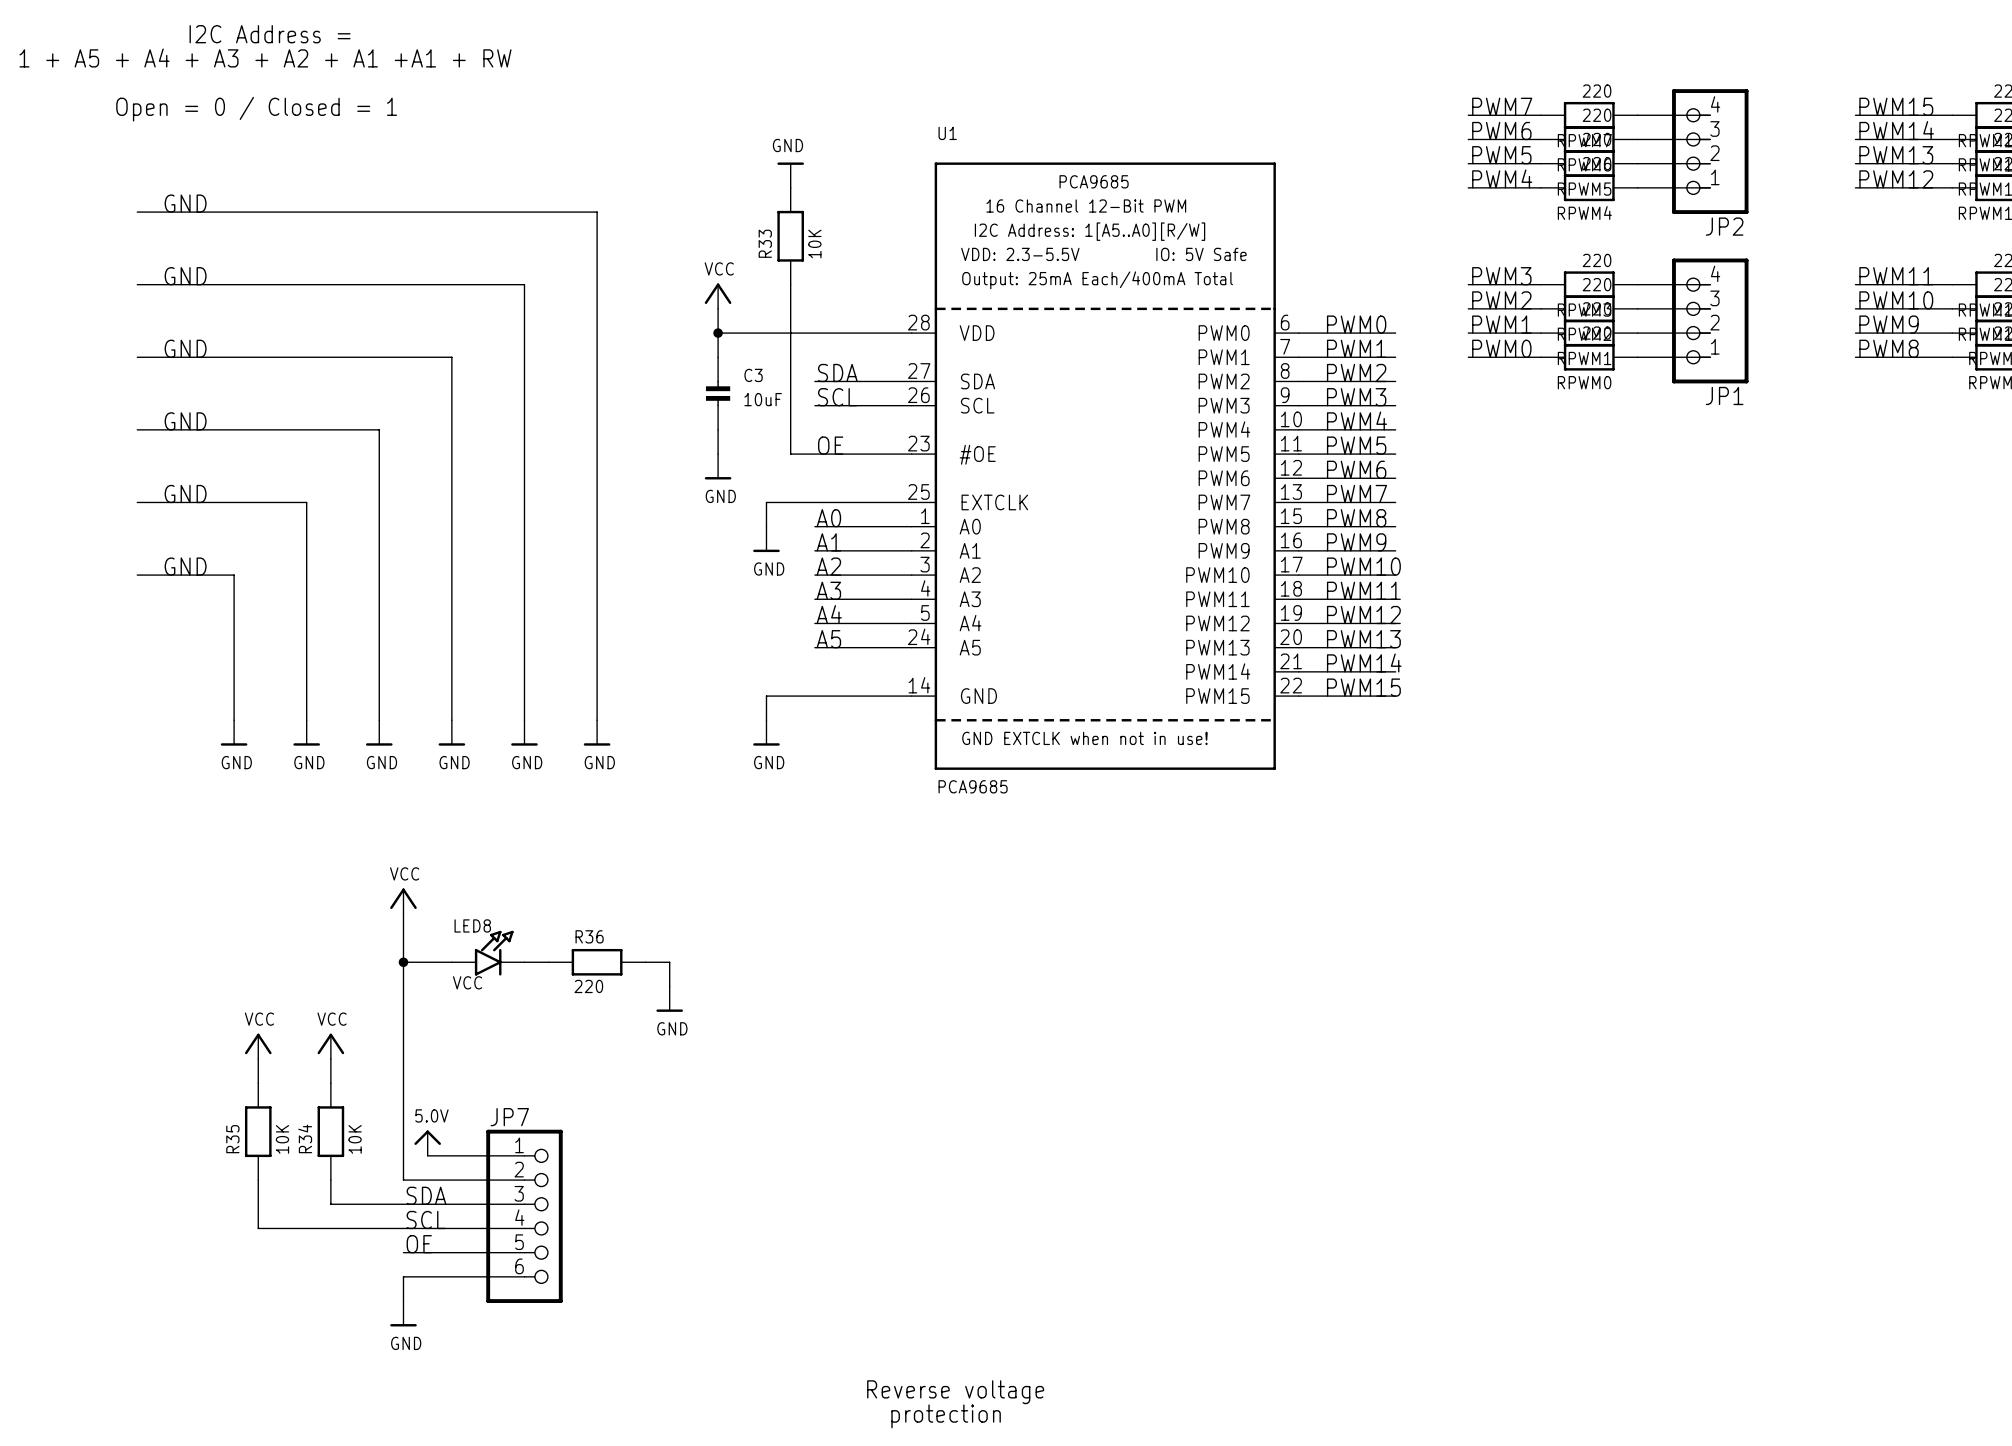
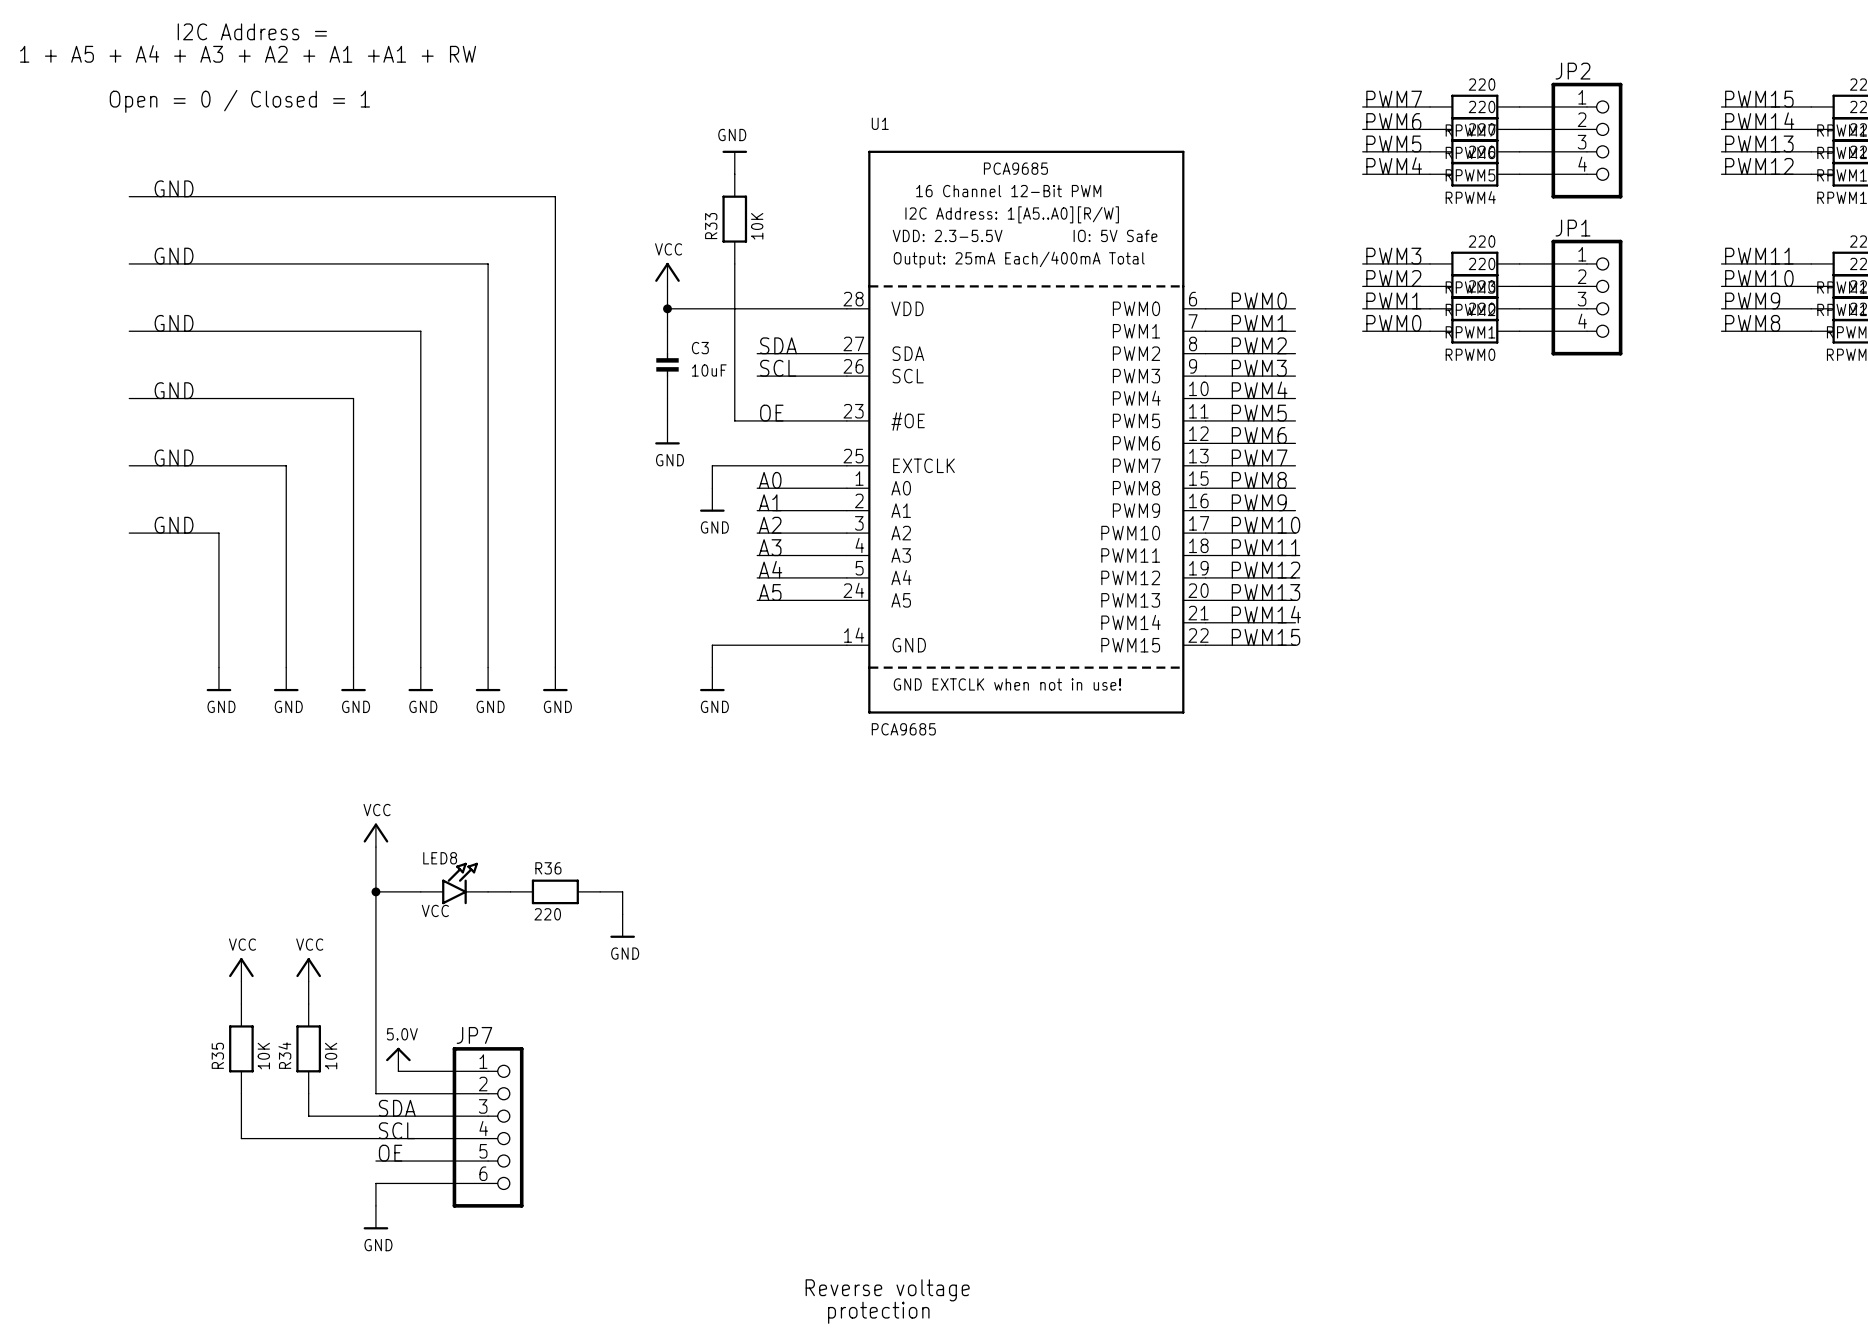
JP2 rotation: 0° (1710, 151) -> 180° (1586, 140)
JP1 rotation: 0° (1710, 320) -> 180° (1586, 297)

